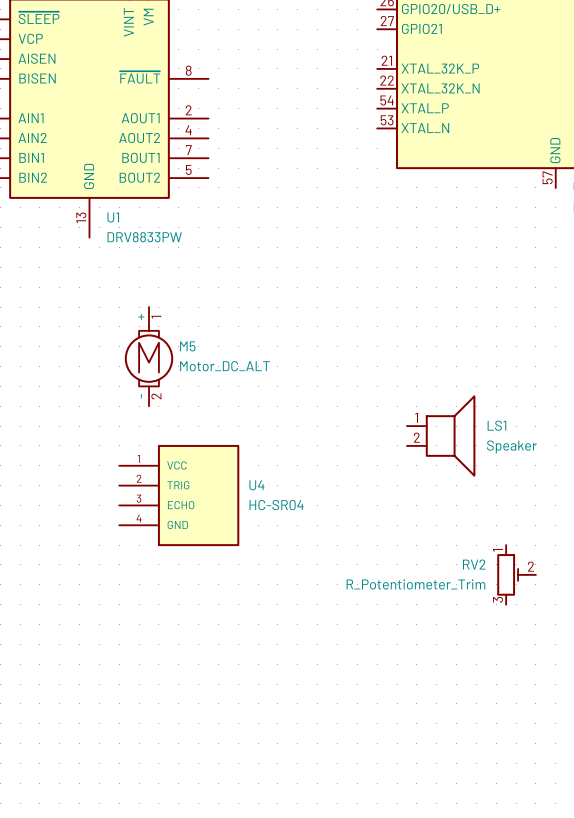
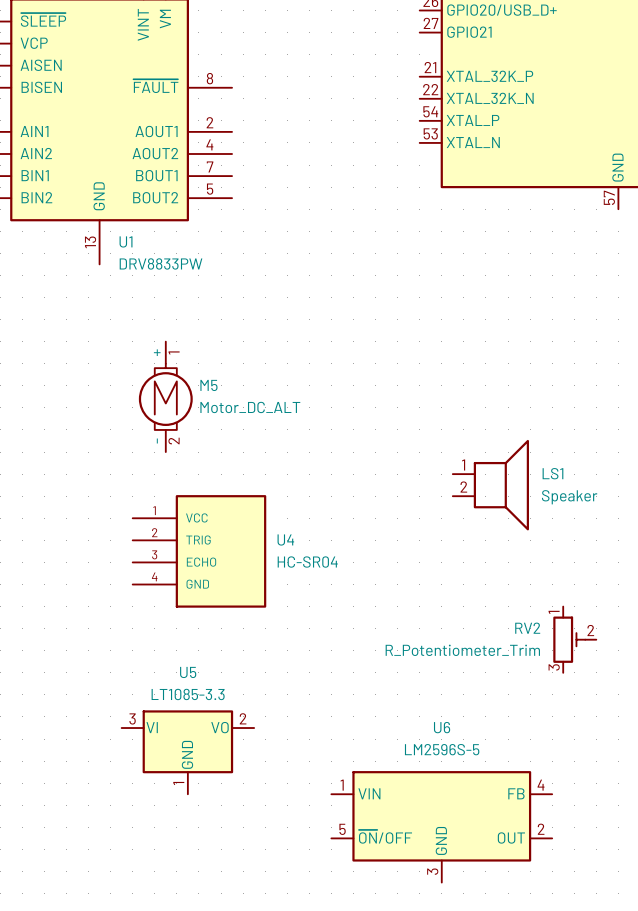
U5: none -> LT1085-3.3 (187, 752)
U6: none -> LM2596S-5 (441, 826)

